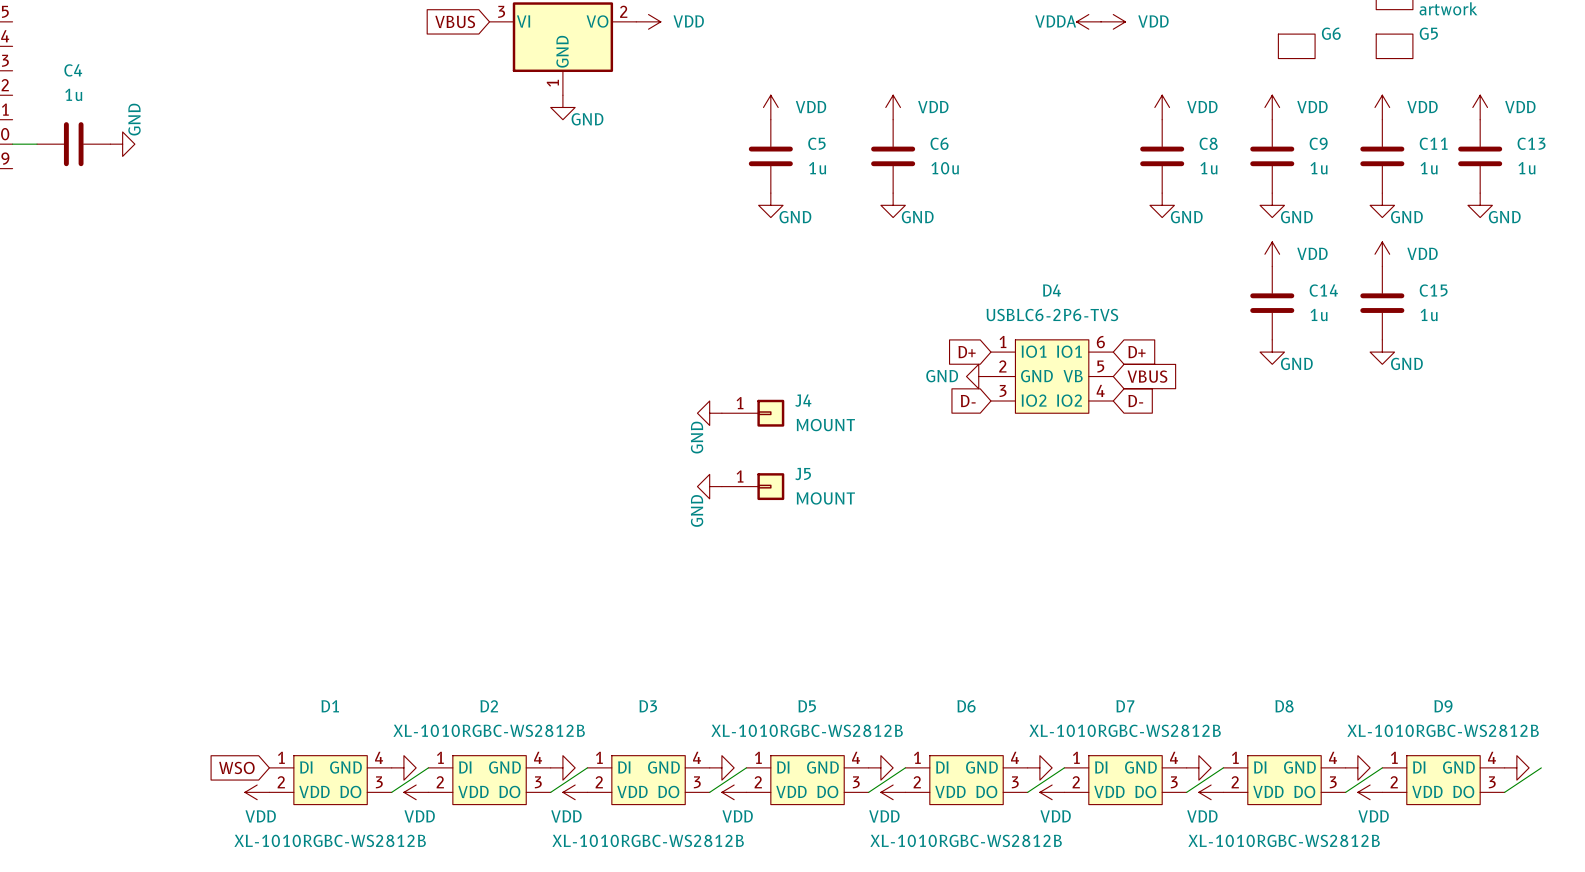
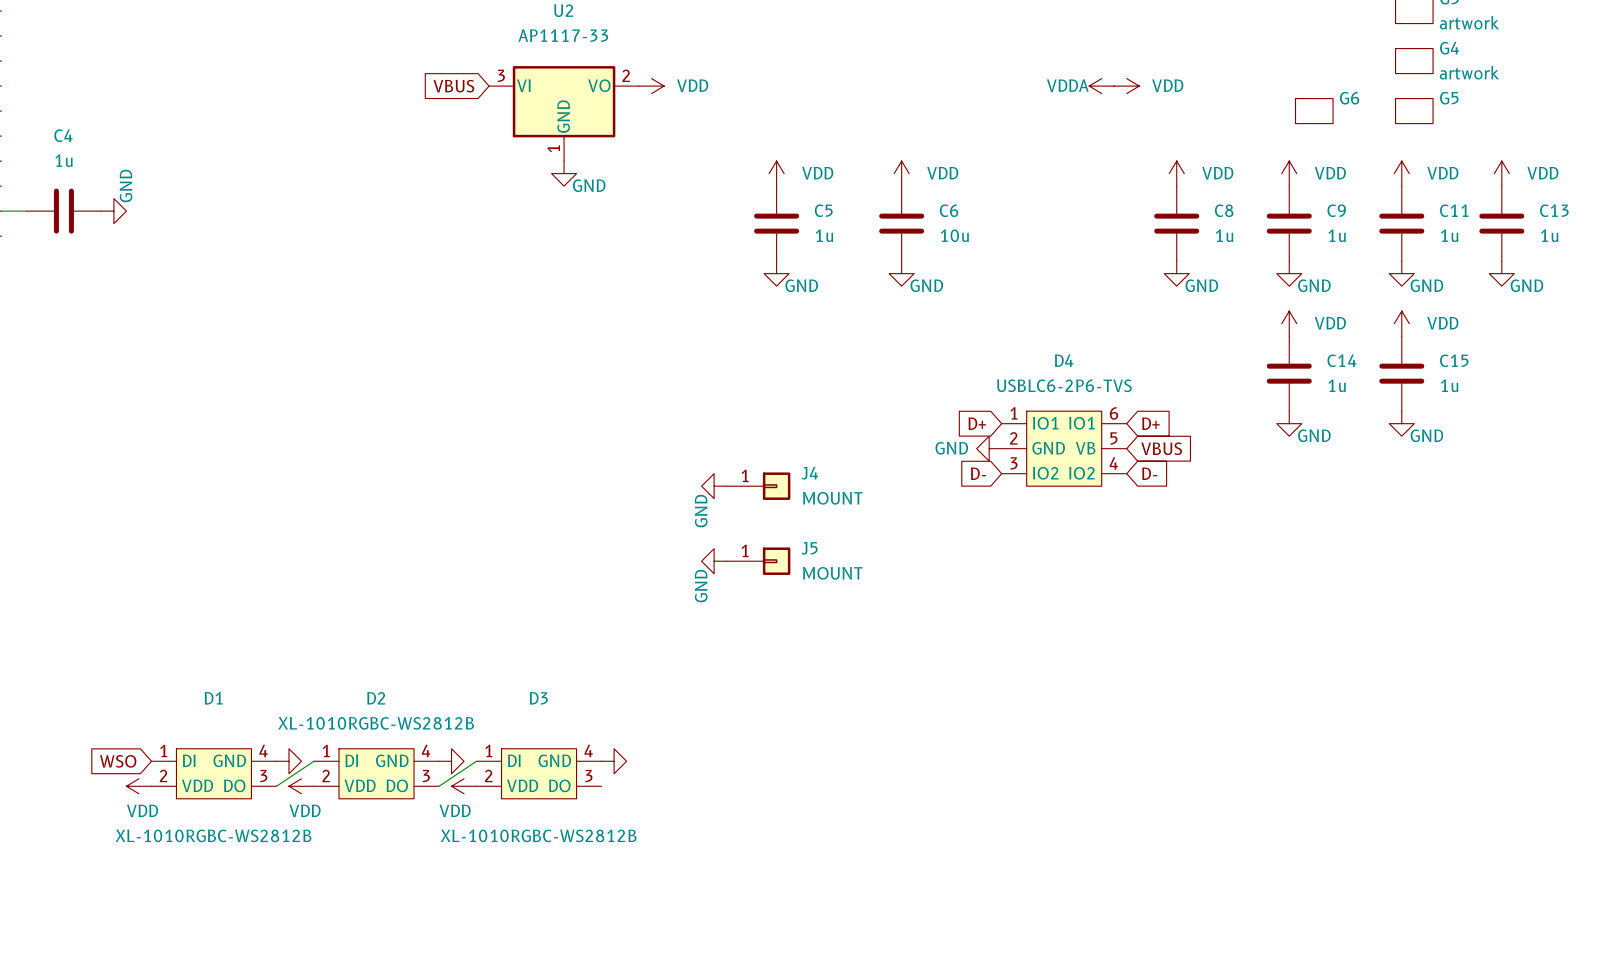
power symbol: none -> (288, 761)
power symbol: none -> (451, 761)
power symbol: none -> (614, 761)
power symbol: none -> VDD (138, 786)
power symbol: none -> VDD (301, 786)
power symbol: none -> VDD (464, 786)
global label position: WSO (236, 767) -> WSO (118, 761)
power symbol: (403, 767) -> none
wire: (428, 767) (391, 792) -> (313, 761) (276, 786)
power symbol: (562, 767) -> none
wire: (587, 767) (550, 792) -> (476, 761) (439, 786)
power symbol: (721, 767) -> none
wire: (746, 767) (709, 792) -> none
power symbol: (880, 767) -> none
wire: (905, 767) (868, 792) -> none
power symbol: (1039, 767) -> none
wire: (1064, 767) (1027, 792) -> none
power symbol: (1198, 767) -> none
wire: (1223, 767) (1186, 792) -> none
power symbol: (1357, 767) -> none
wire: (1382, 767) (1345, 792) -> none
power symbol: (1516, 767) -> none
wire: (1541, 767) (1504, 792) -> none
D1 position: (330, 780) -> (213, 773)
D2 position: (489, 780) -> (376, 773)
D3 position: (648, 780) -> (539, 773)
D5: XL-1010RGBC-WS2812B (807, 780) -> none
D6: XL-1010RGBC-WS2812B (966, 780) -> none
D7: XL-1010RGBC-WS2812B (1125, 780) -> none
D8: XL-1010RGBC-WS2812B (1284, 780) -> none
D9: XL-1010RGBC-WS2812B (1443, 780) -> none
power symbol: VDD (257, 792) -> none
power symbol: VDD (416, 792) -> none
power symbol: VDD (575, 792) -> none
power symbol: VDD (734, 792) -> none
power symbol: VDD (893, 792) -> none
power symbol: VDD (1052, 792) -> none
power symbol: VDD (1211, 792) -> none
power symbol: VDD (1370, 792) -> none

